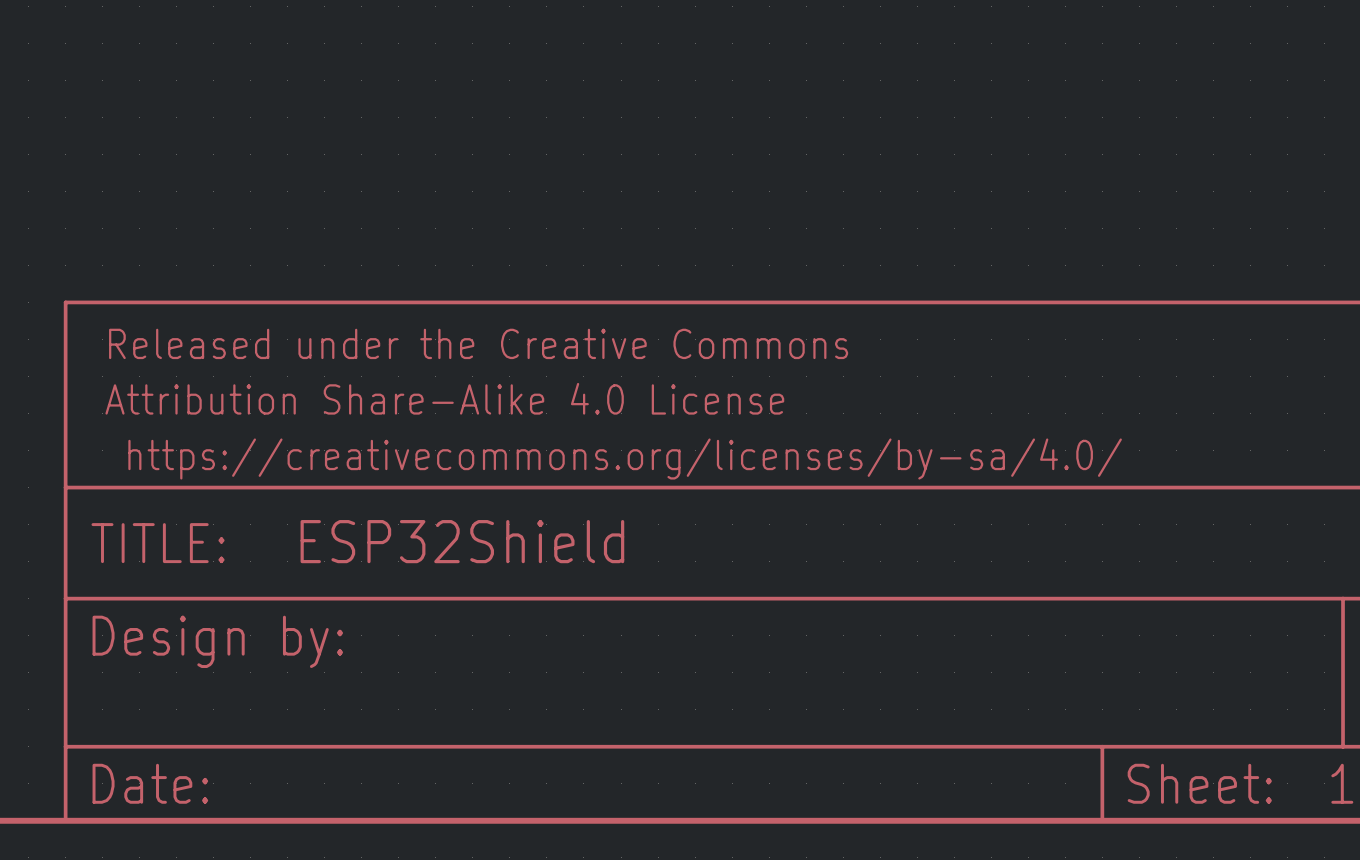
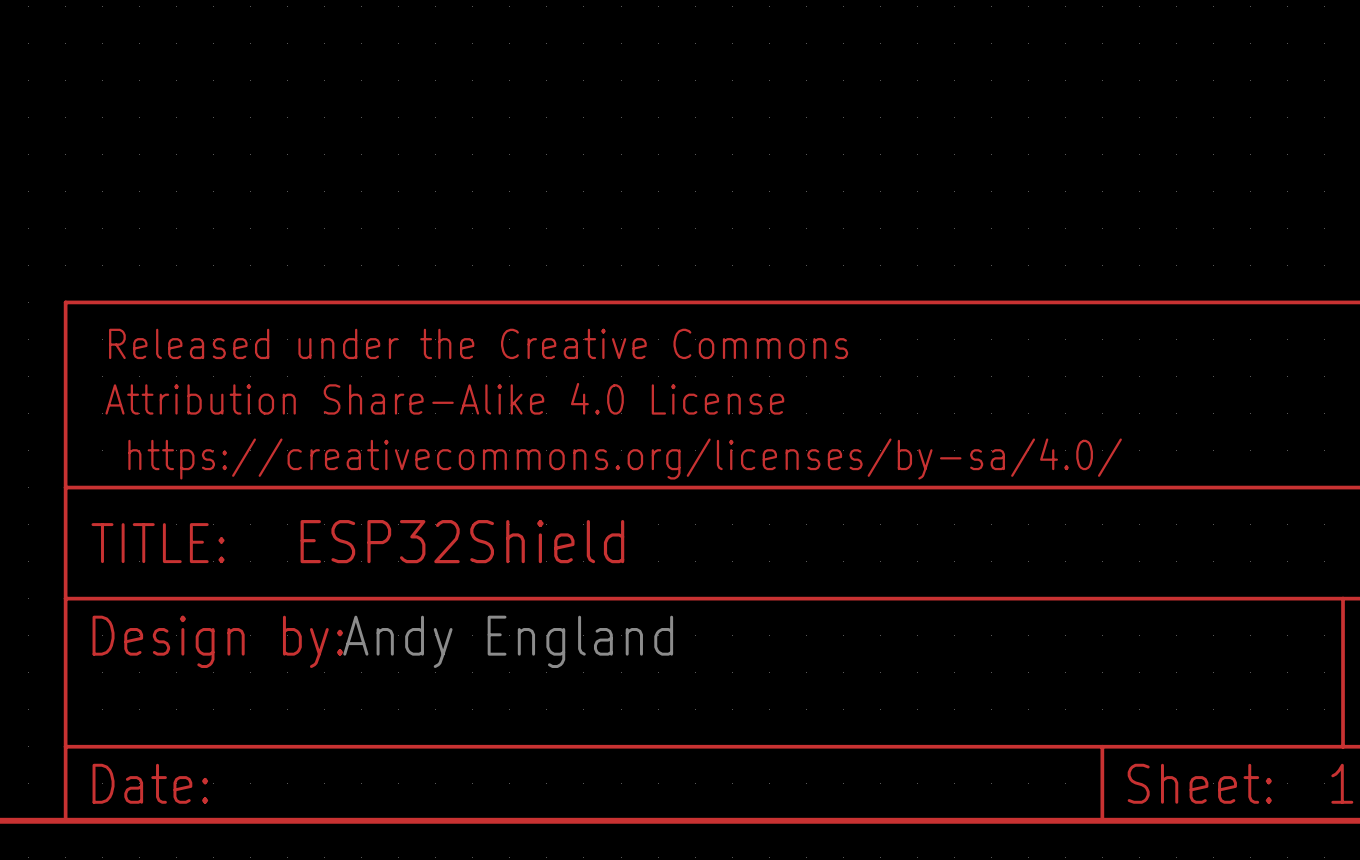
text: none -> Andy England (508, 641)

